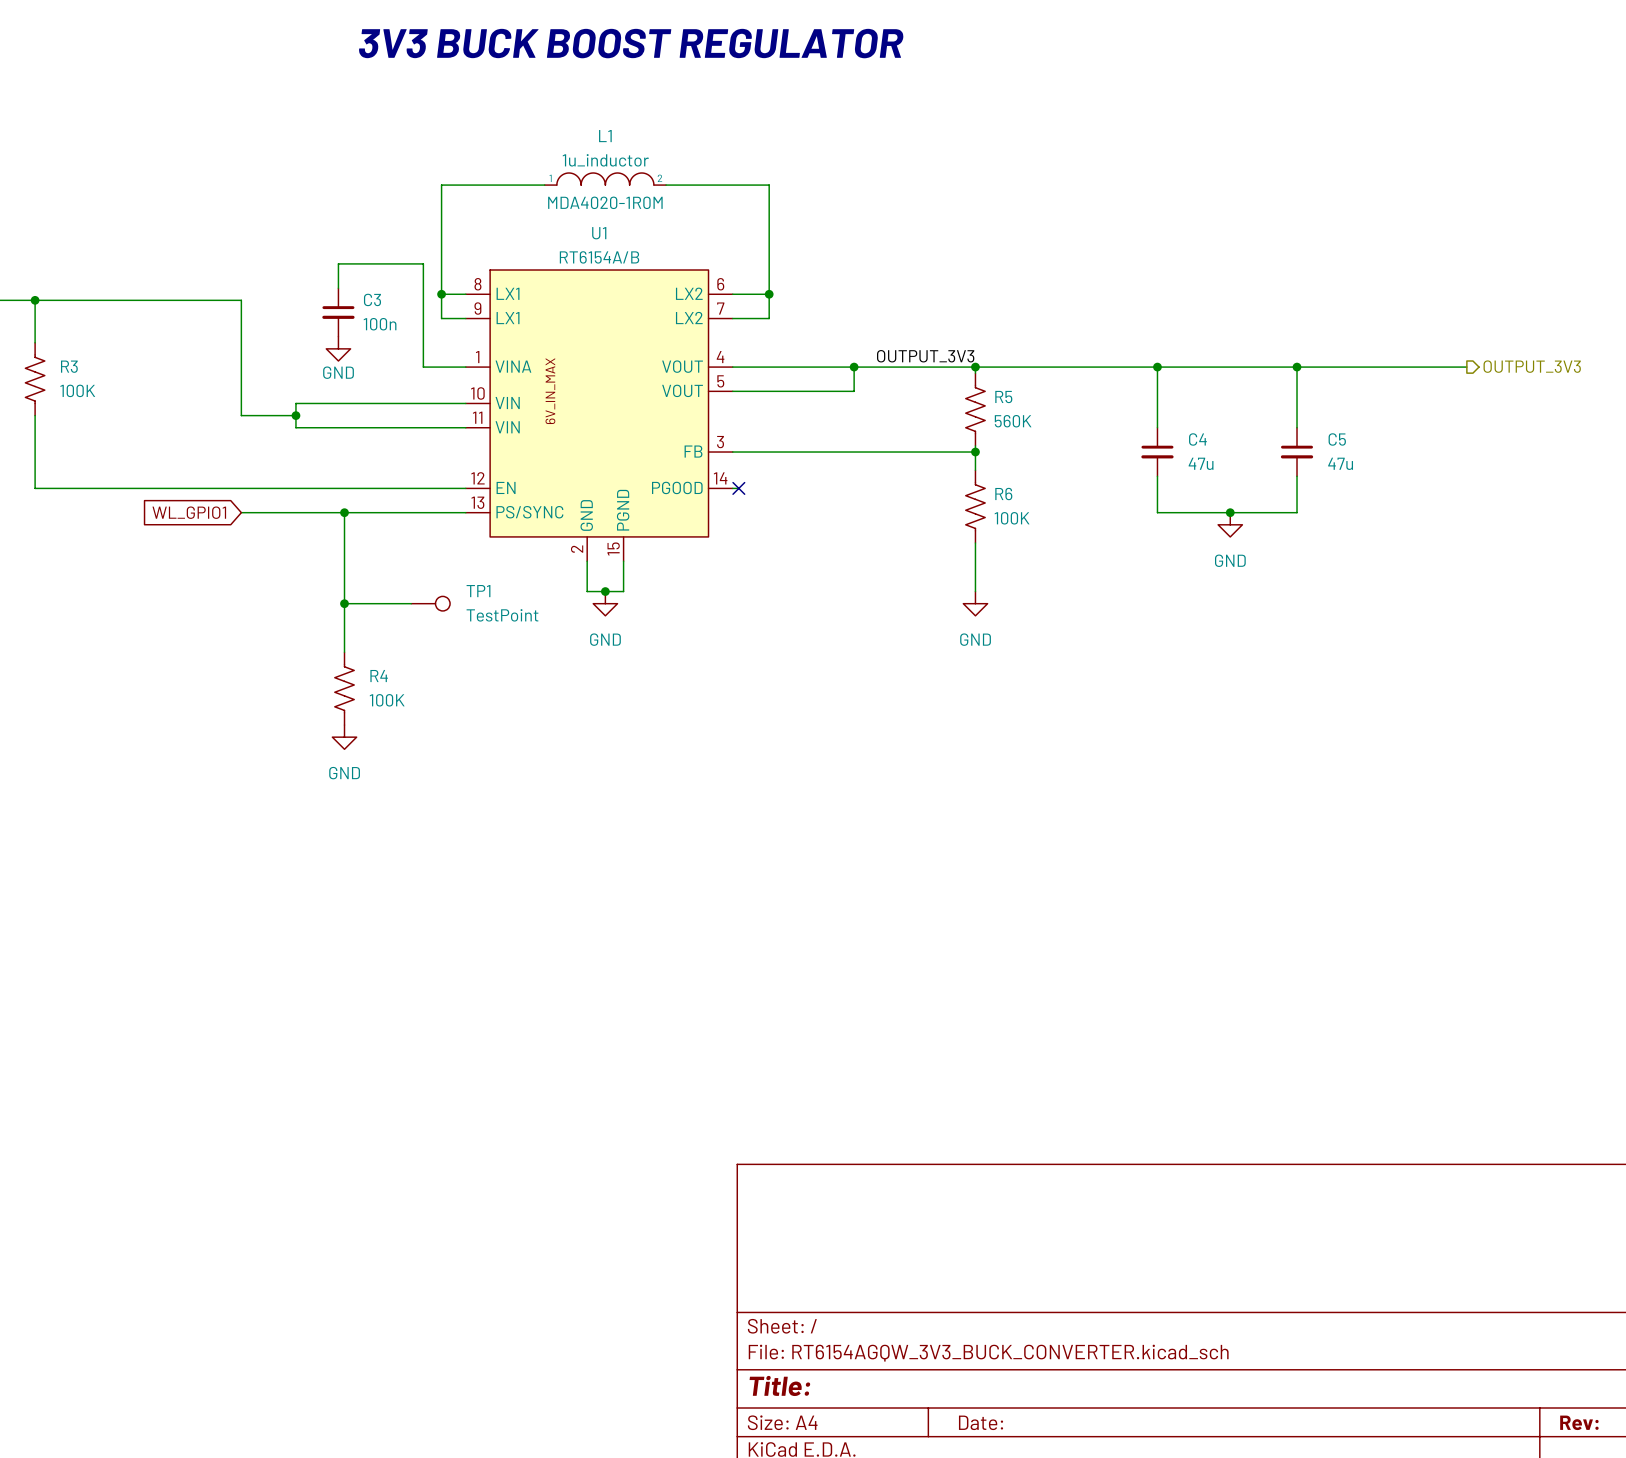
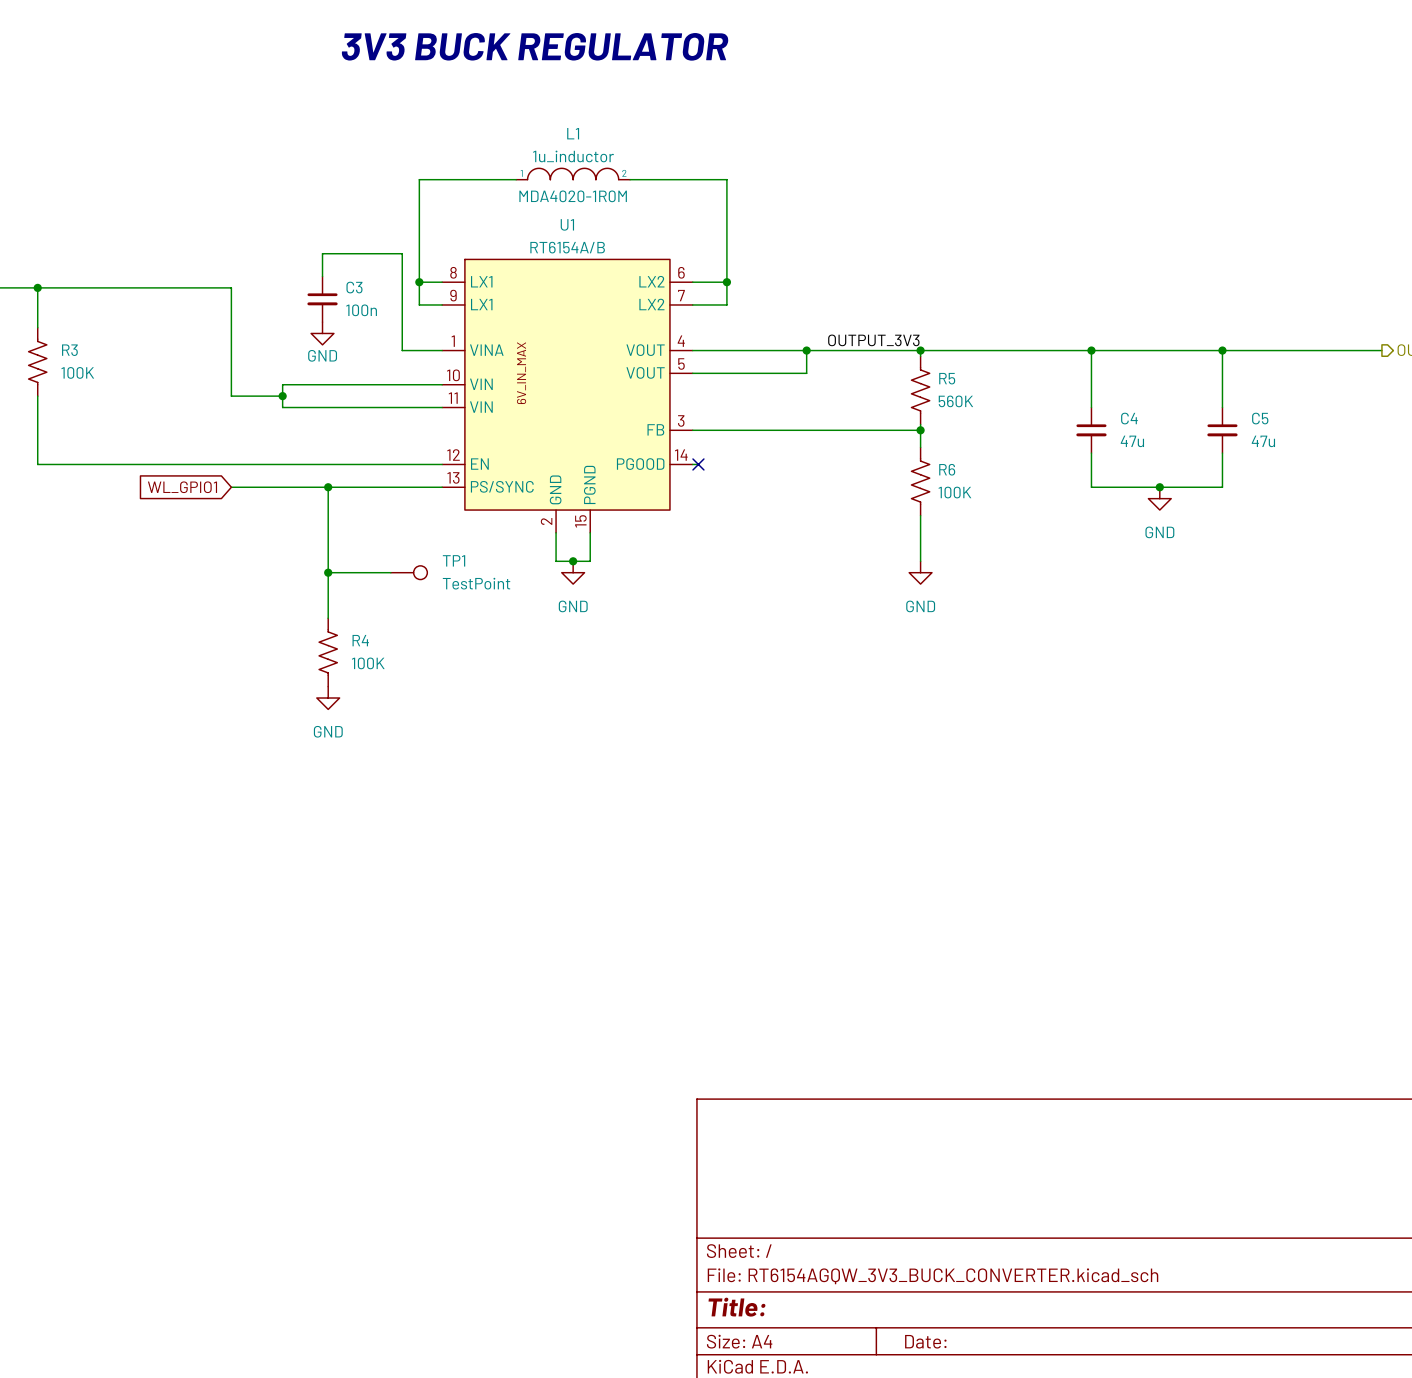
text: 3V3 BUCK BOOST REGULATOR (631, 43) -> 3V3 BUCK REGULATOR (535, 46)

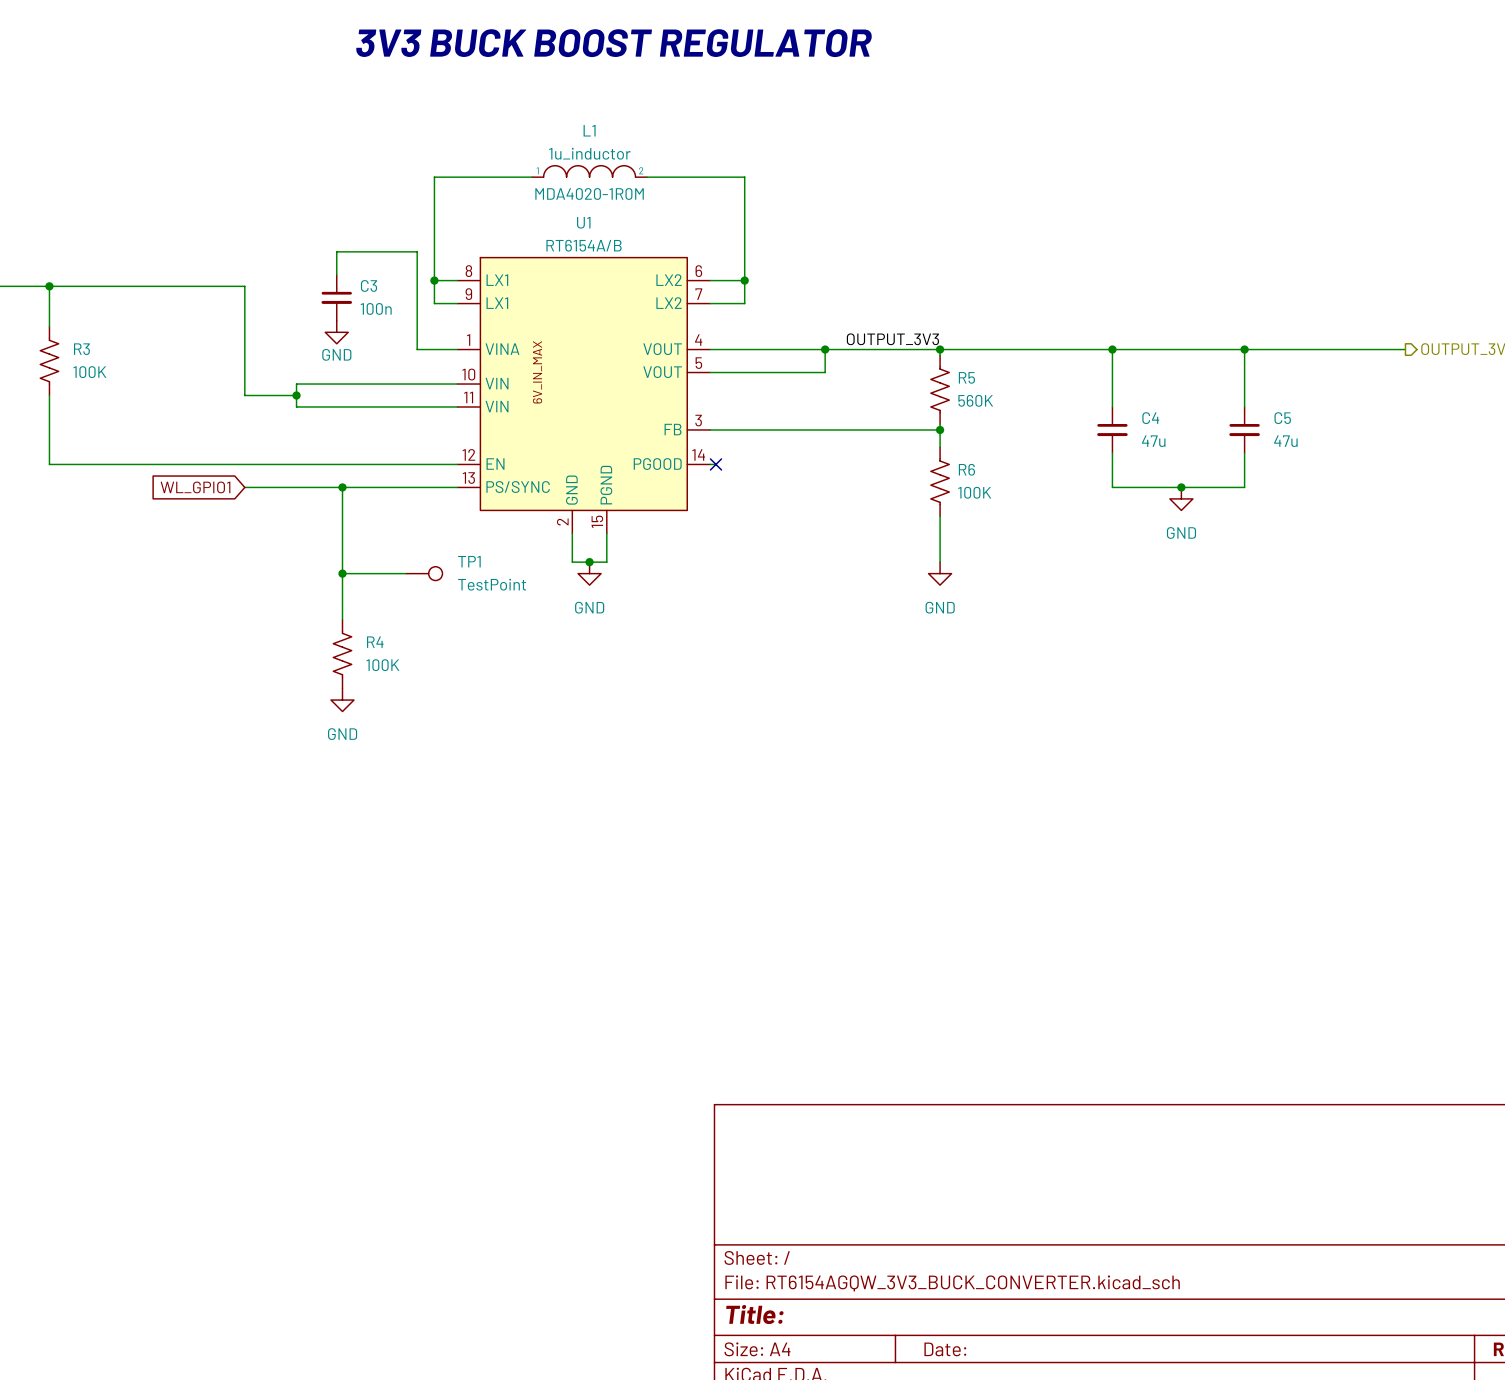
text: 3V3 BUCK REGULATOR (535, 46) -> 3V3 BUCK BOOST REGULATOR (614, 43)

